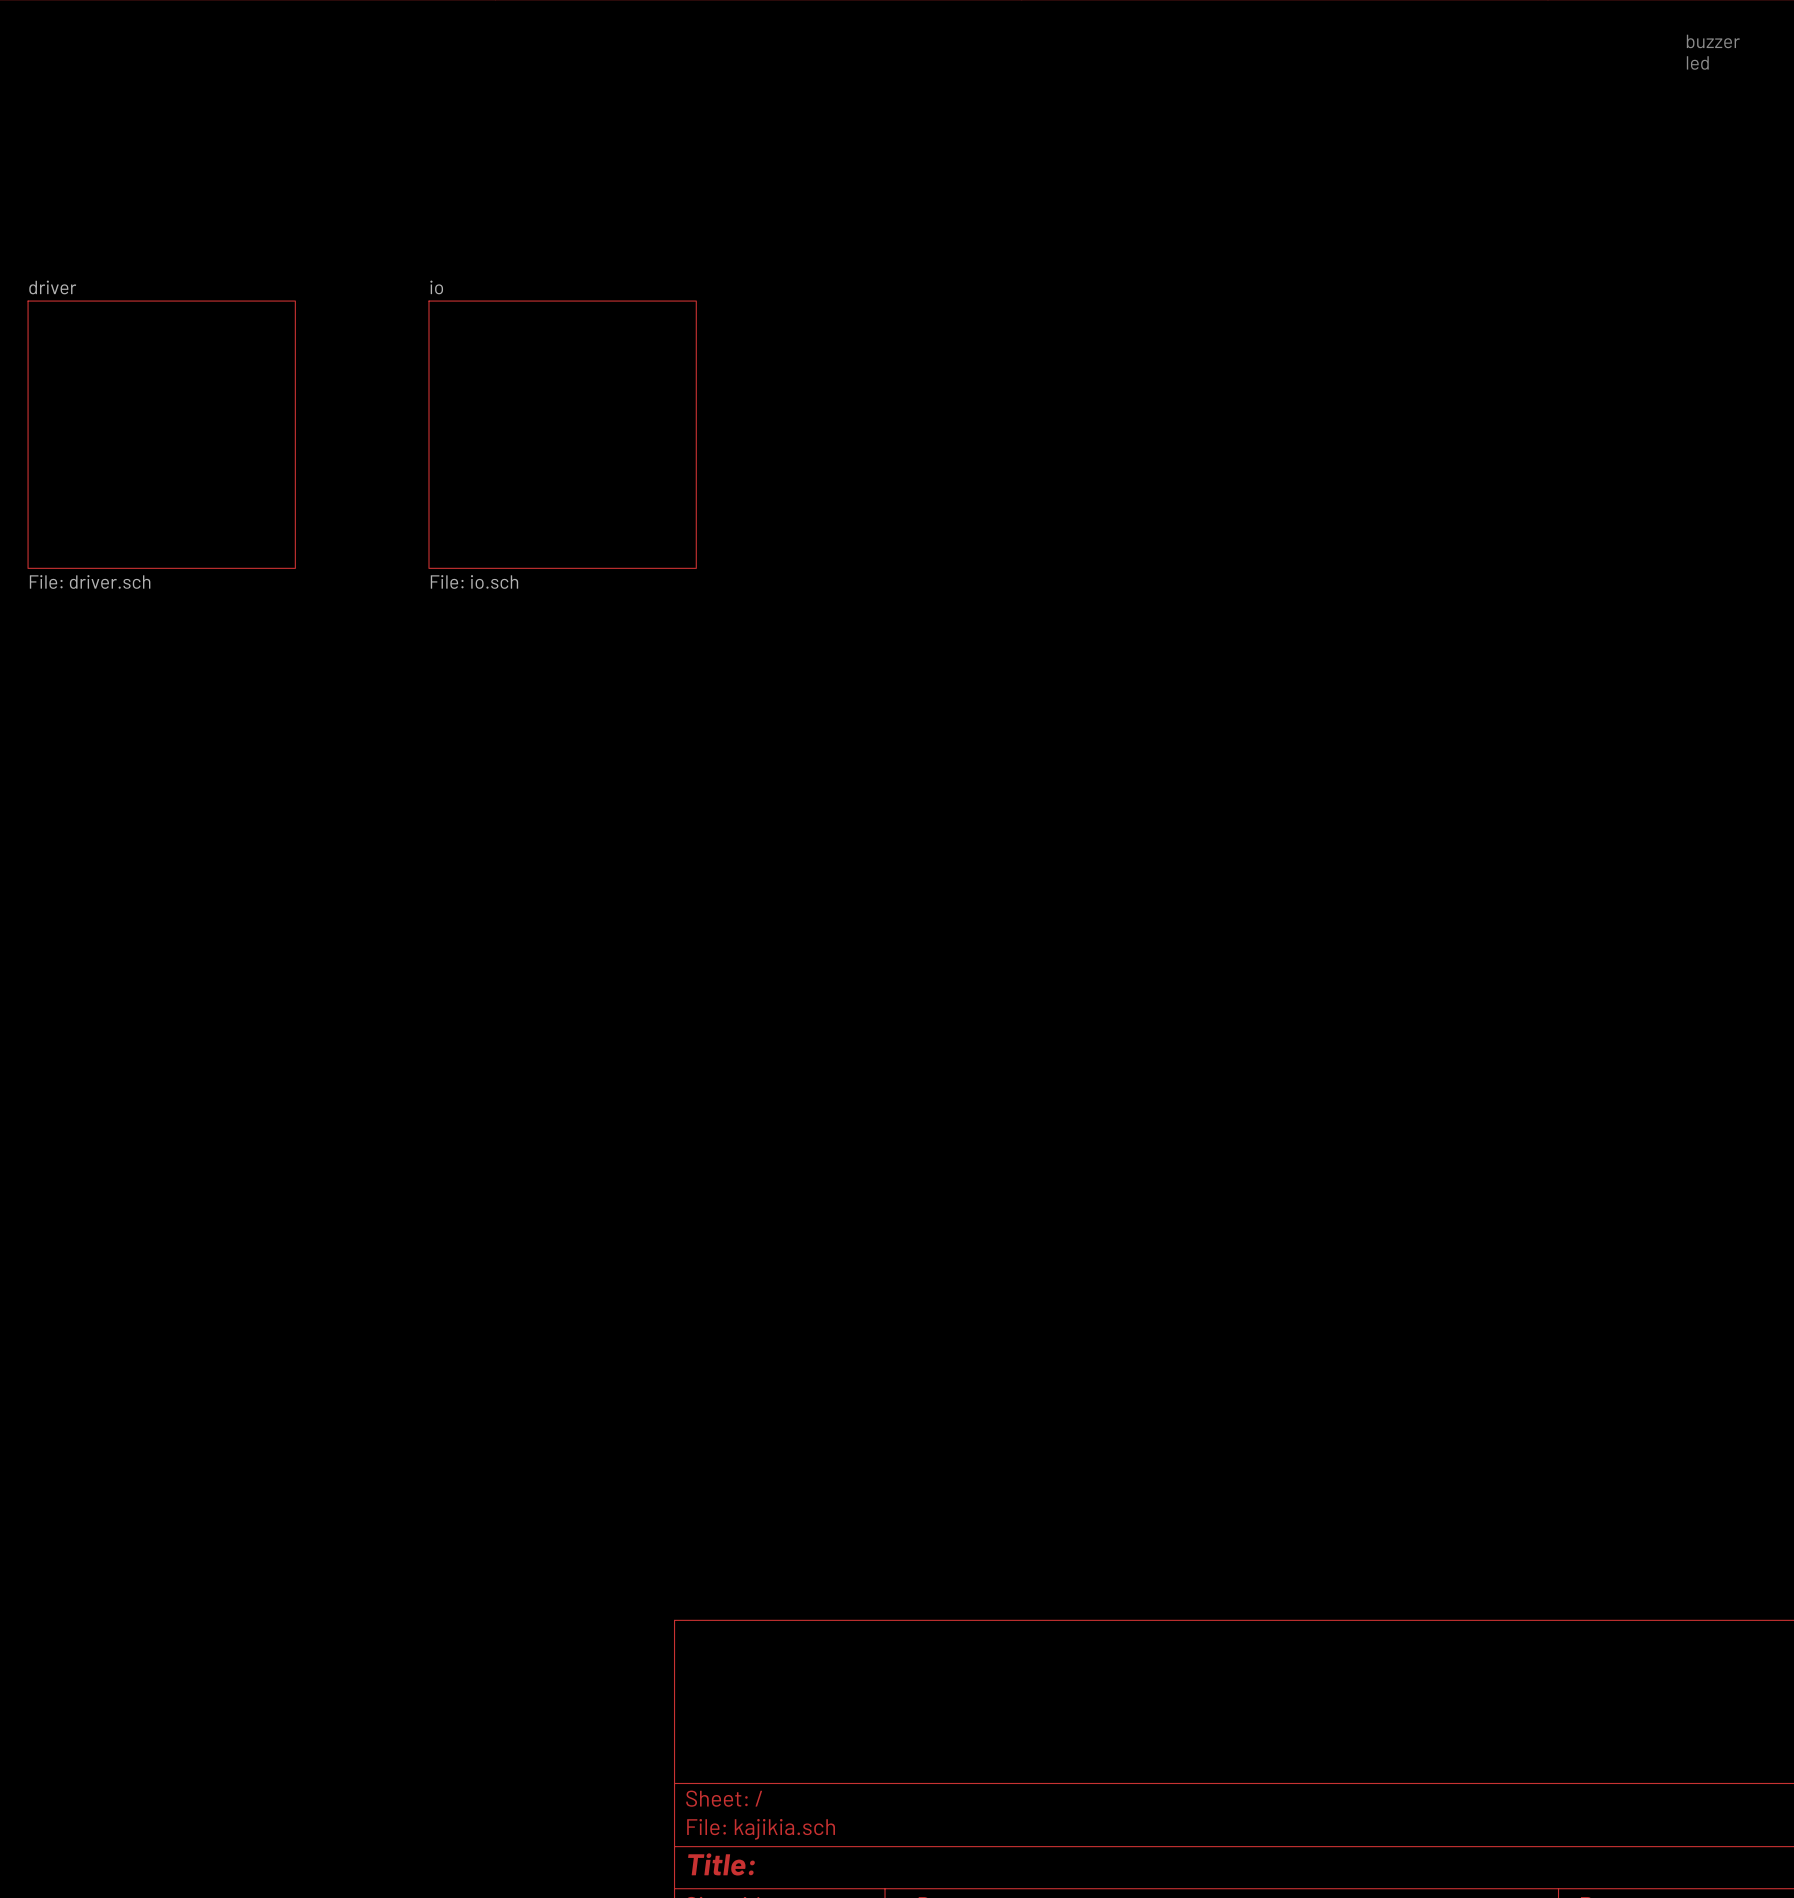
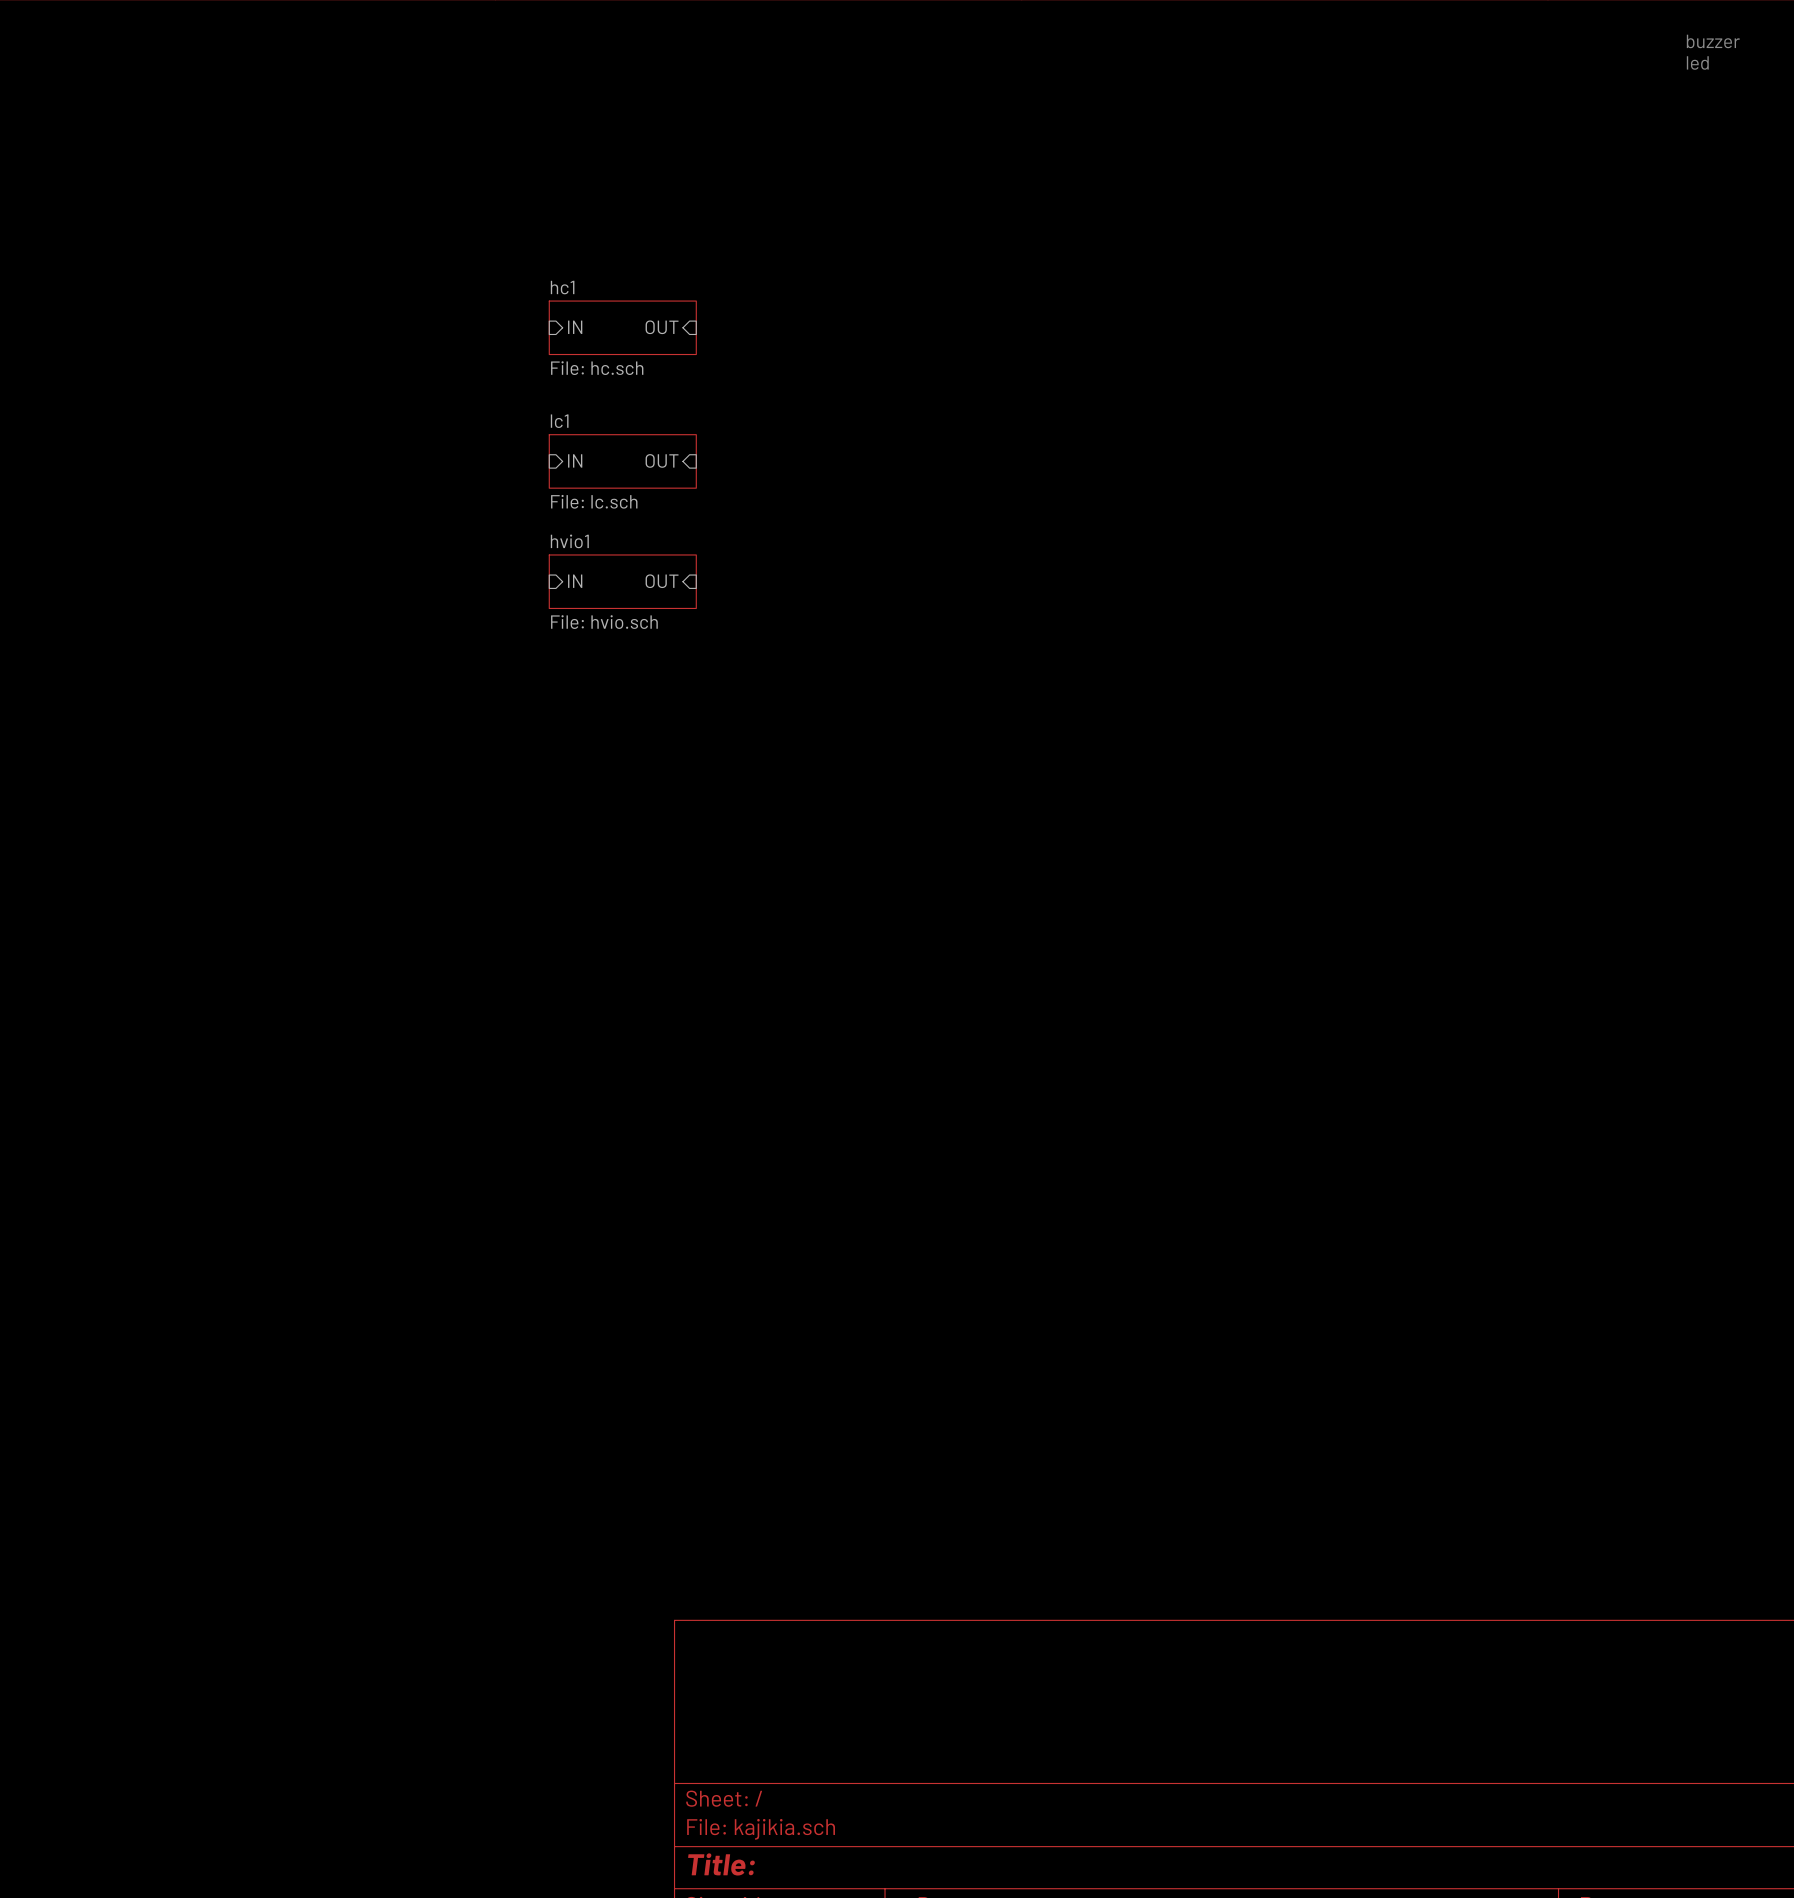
sheet pin: none -> IN (575, 327)
sheet hc1: none -> File: hc.sch (622, 327)
sheet pin: none -> OUT (662, 327)
sheet driver: File: driver.sch (161, 434) -> none
sheet io: File: io.sch (562, 434) -> none
sheet pin: none -> IN (575, 460)
sheet pin: none -> OUT (662, 460)
sheet lc1: none -> File: lc.sch (622, 461)
sheet pin: none -> IN (575, 581)
sheet hvio1: none -> File: hvio.sch (622, 581)
sheet pin: none -> OUT (662, 581)

